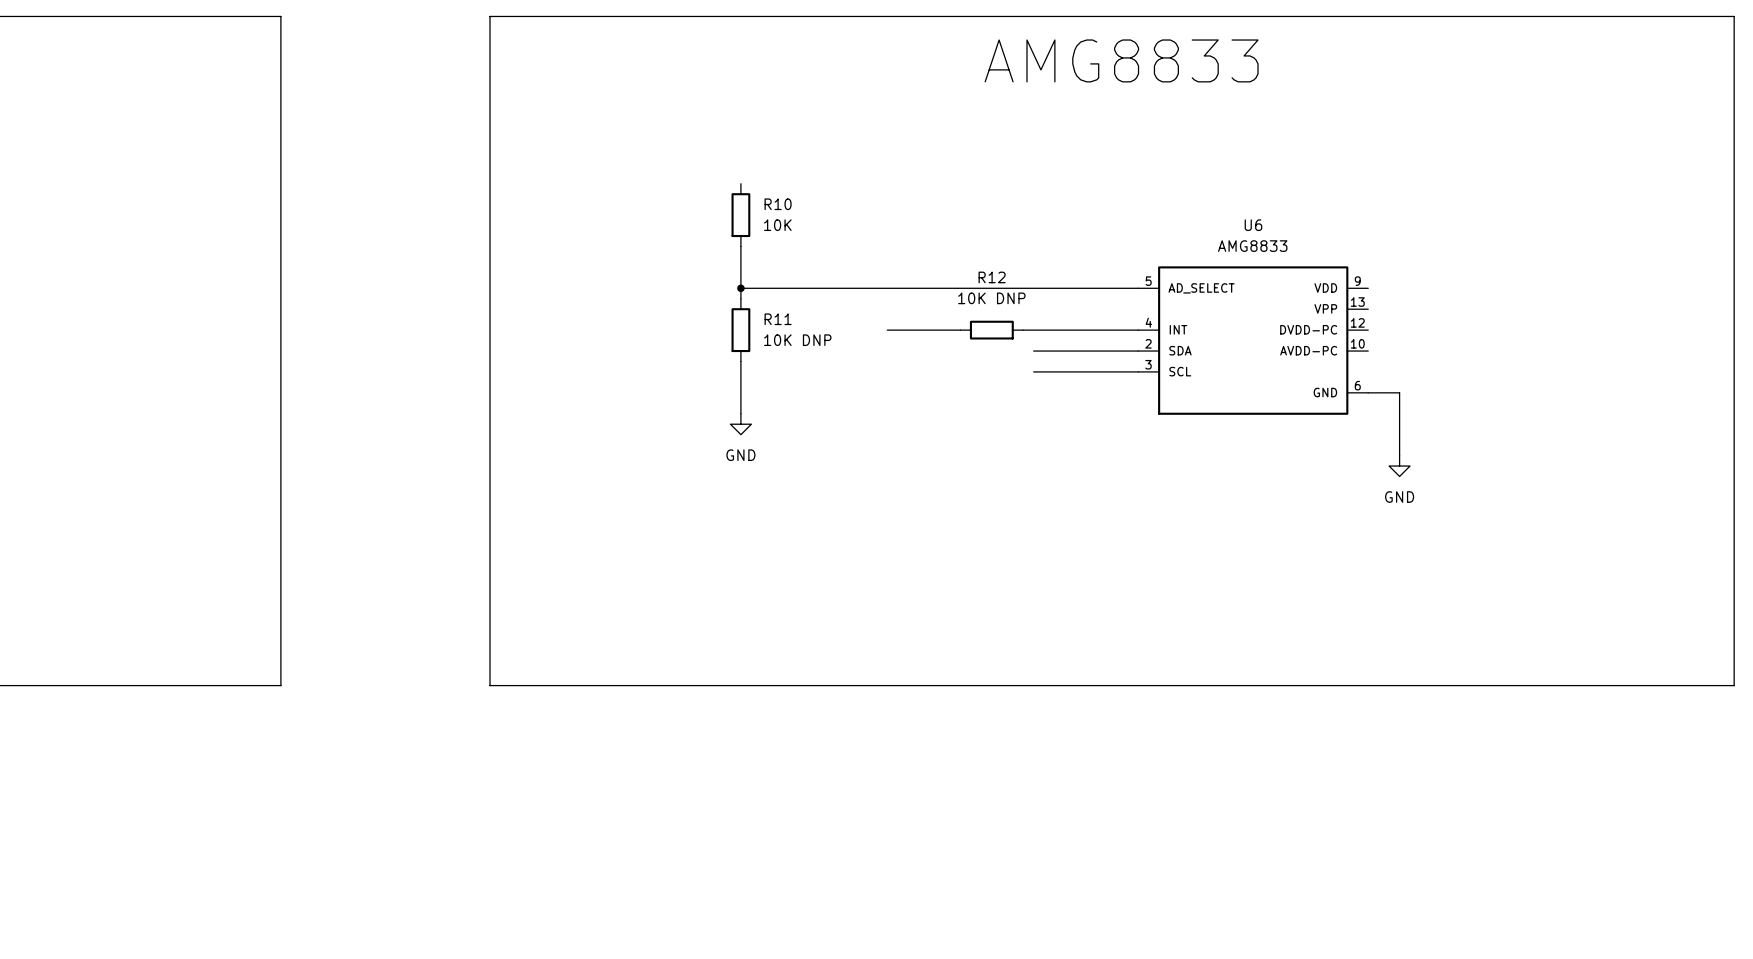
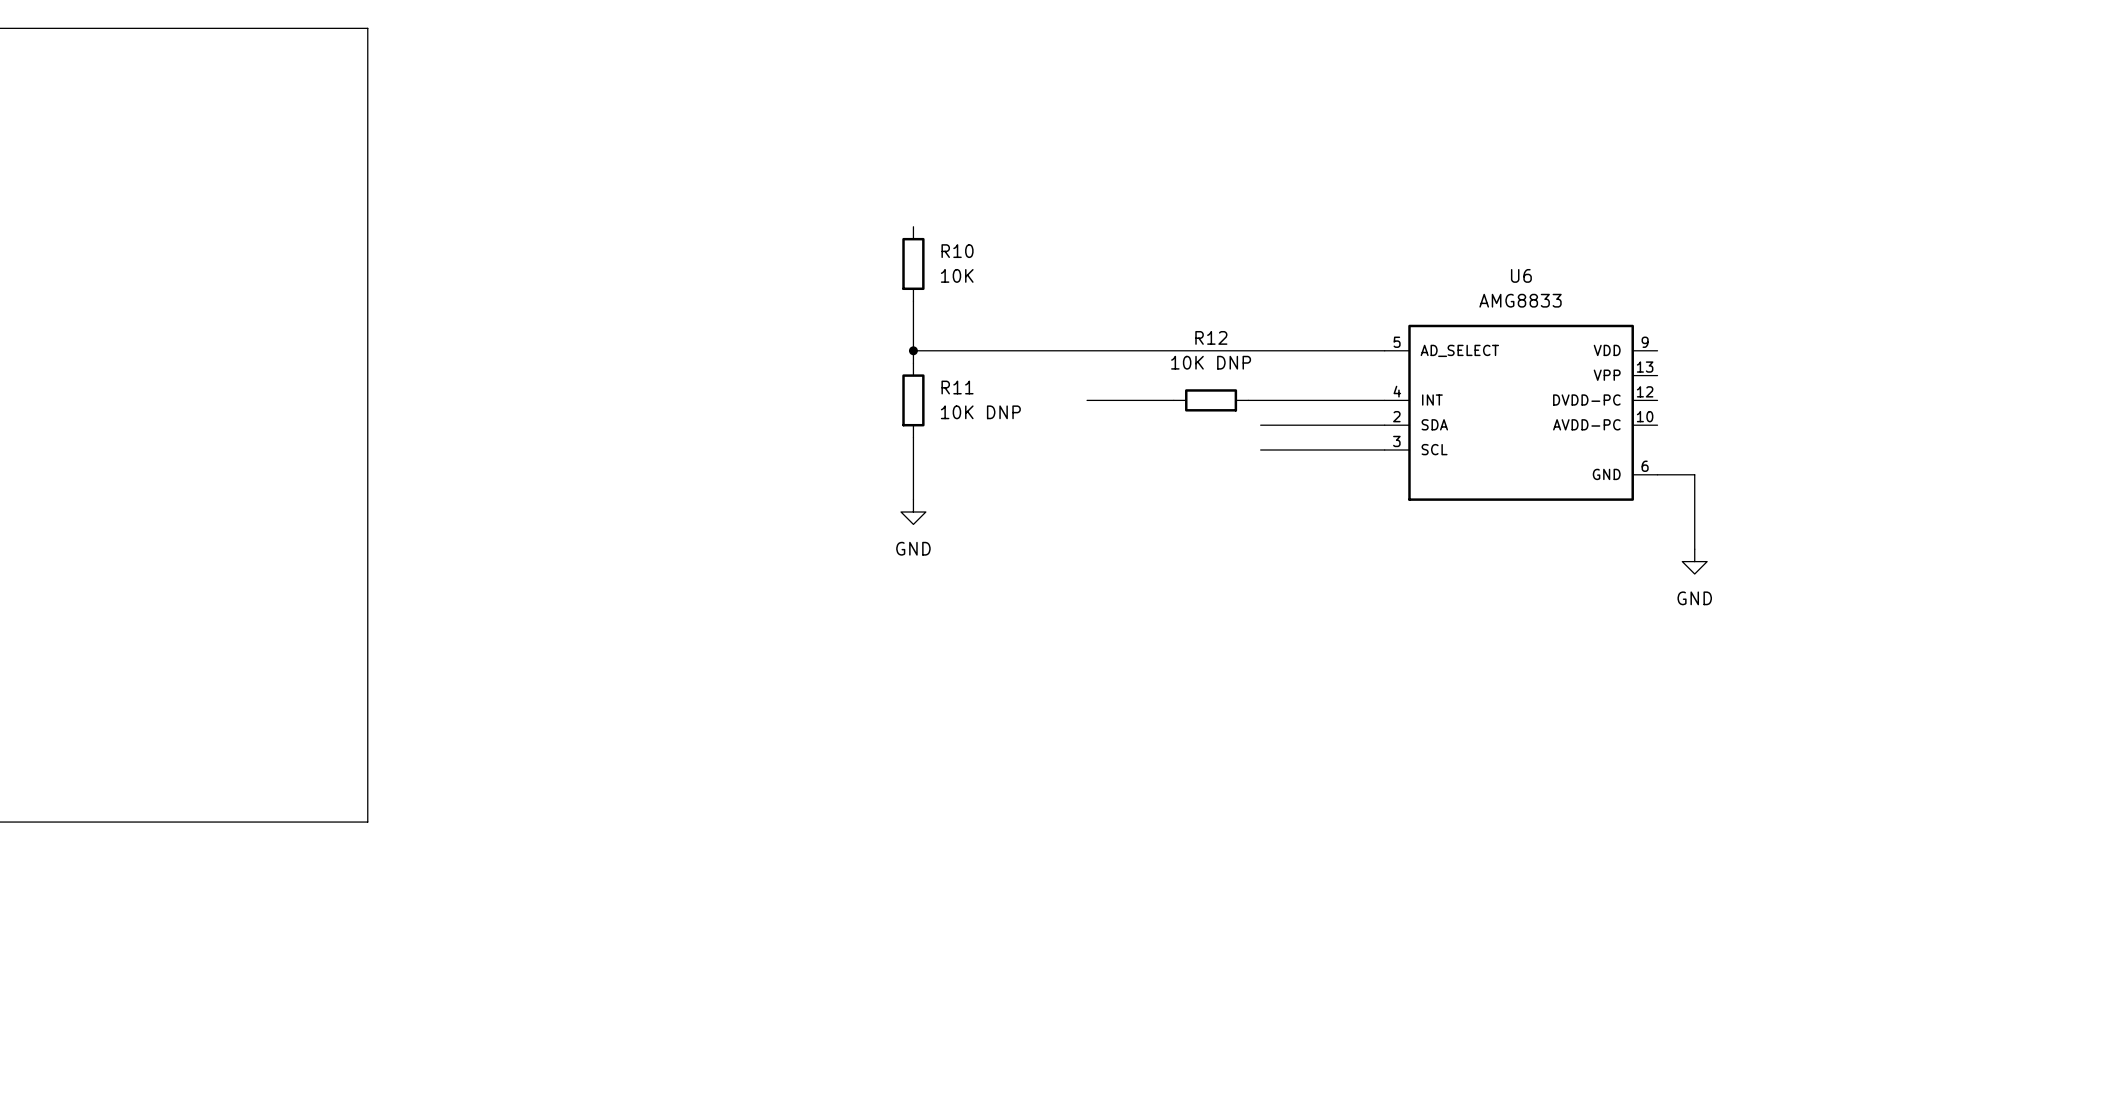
line: (490, 16) (1734, 16) (1734, 685) (490, 685) (490, 16) -> none
text: AMG8833 (1121, 60) -> none

